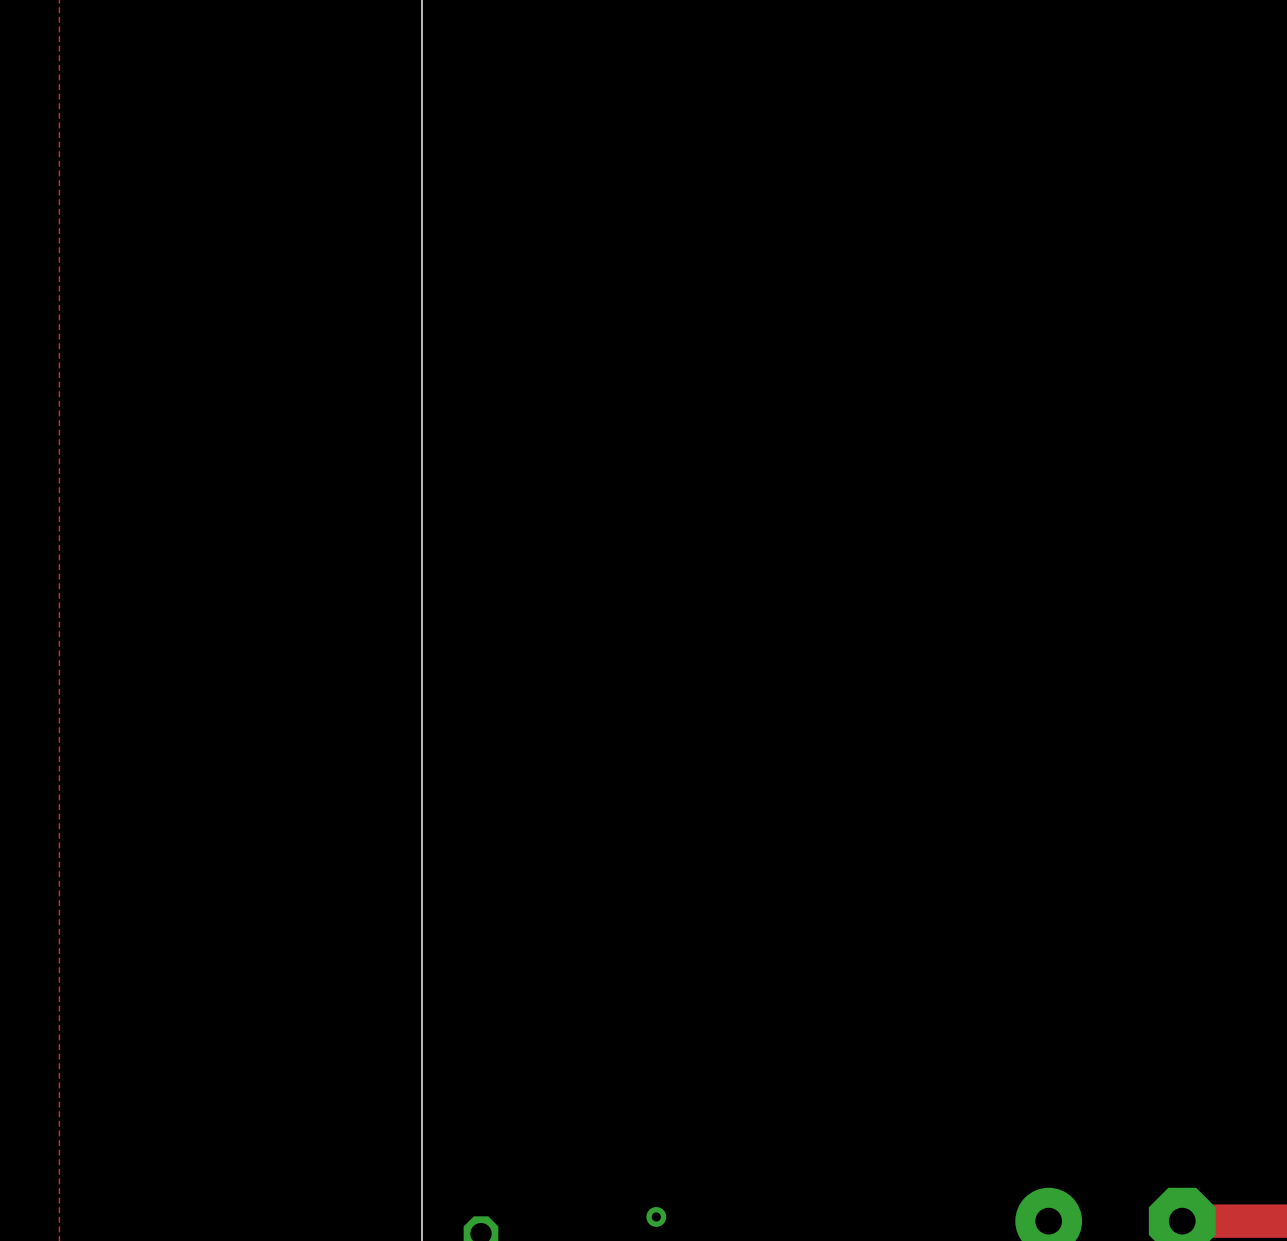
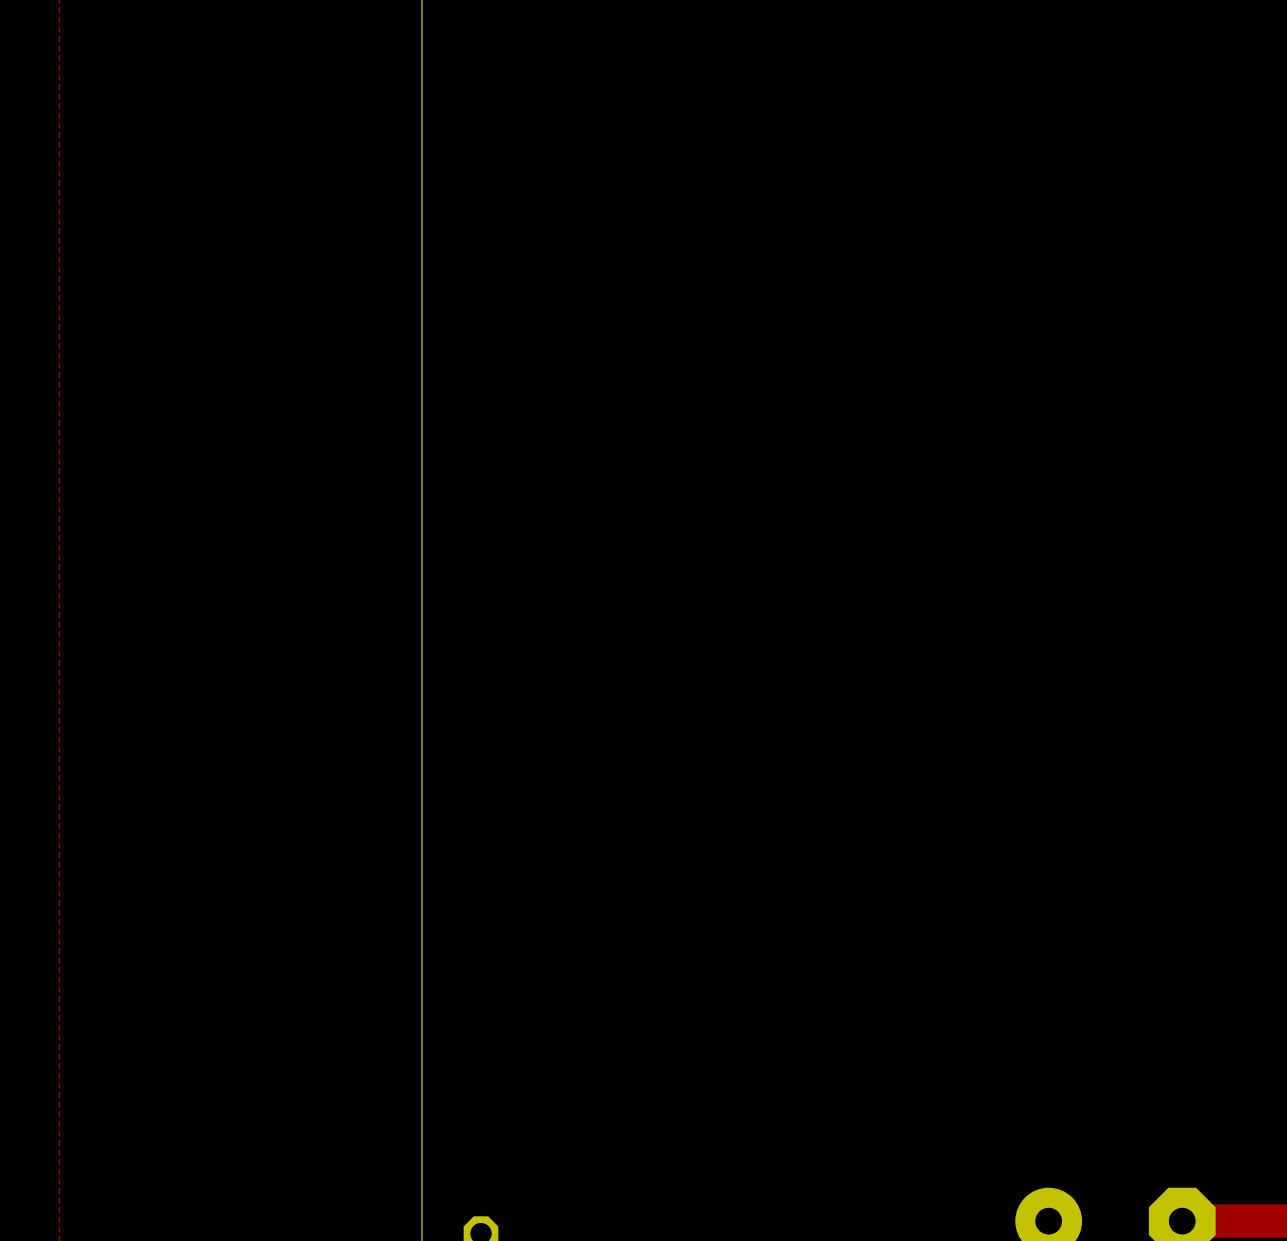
via: (656, 1216) -> none

